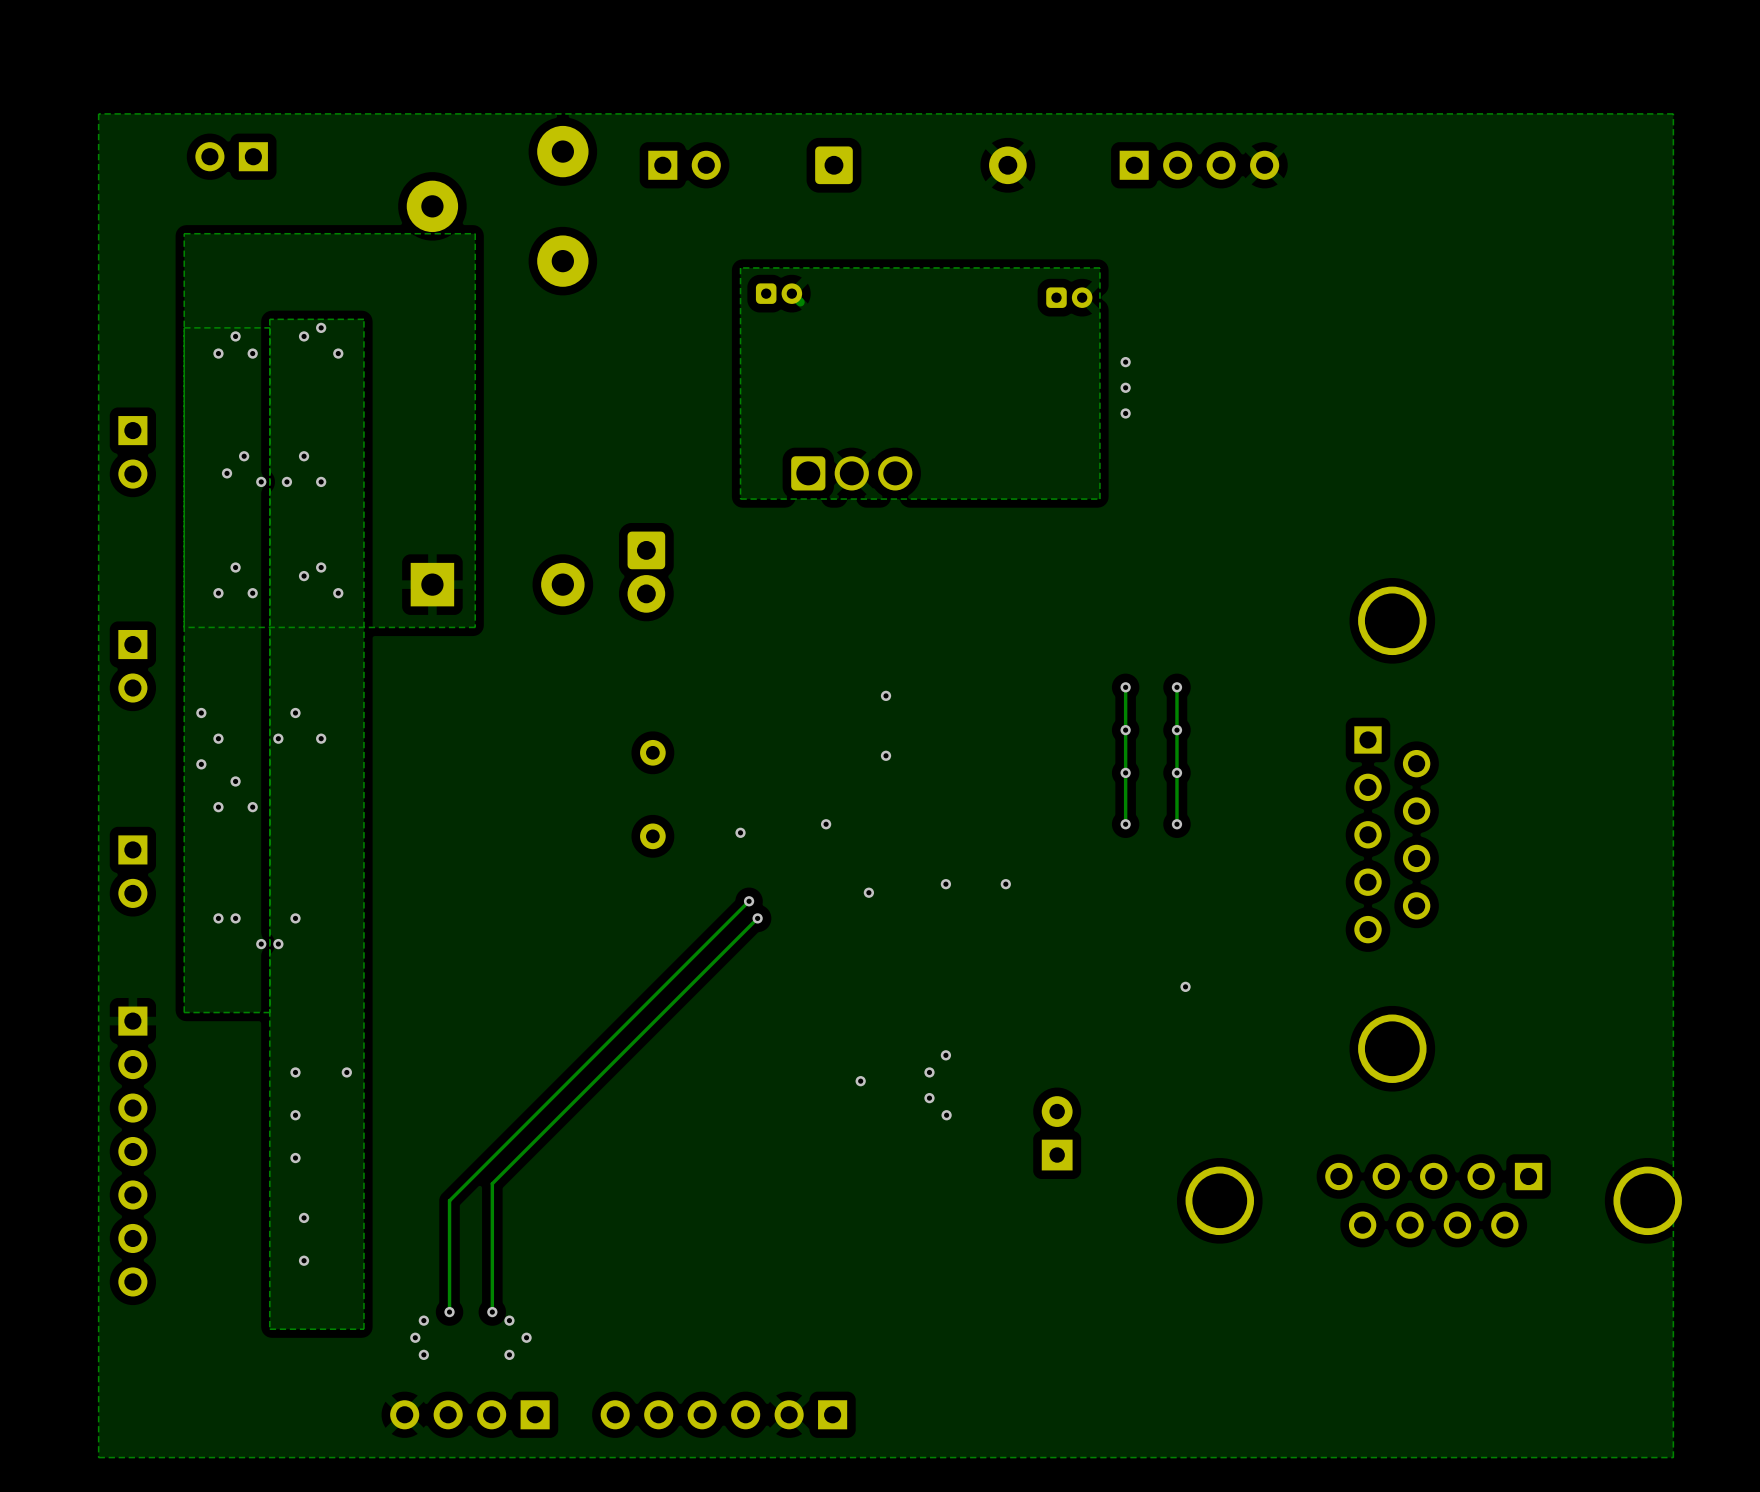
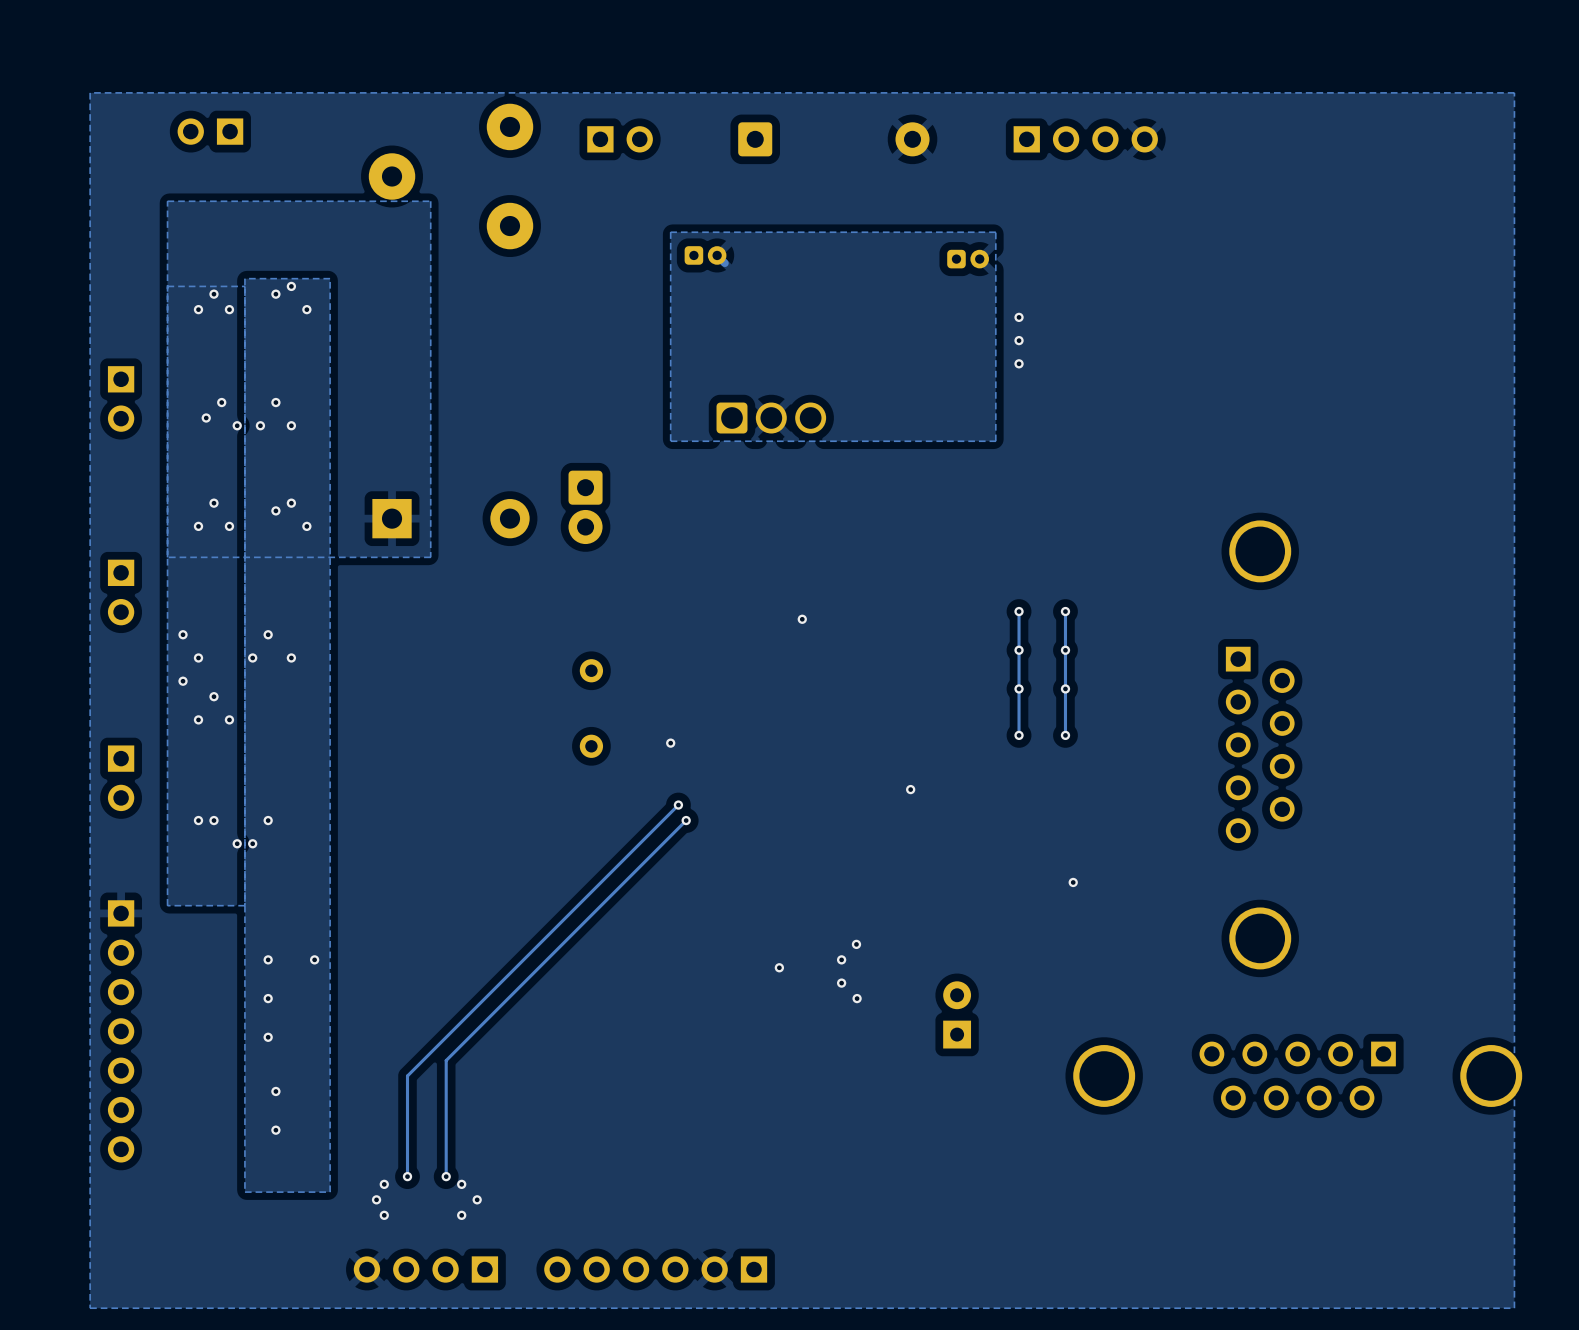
via: (886, 755) -> none
via: (826, 824) -> none
via: (945, 884) -> none
via: (868, 892) -> none

